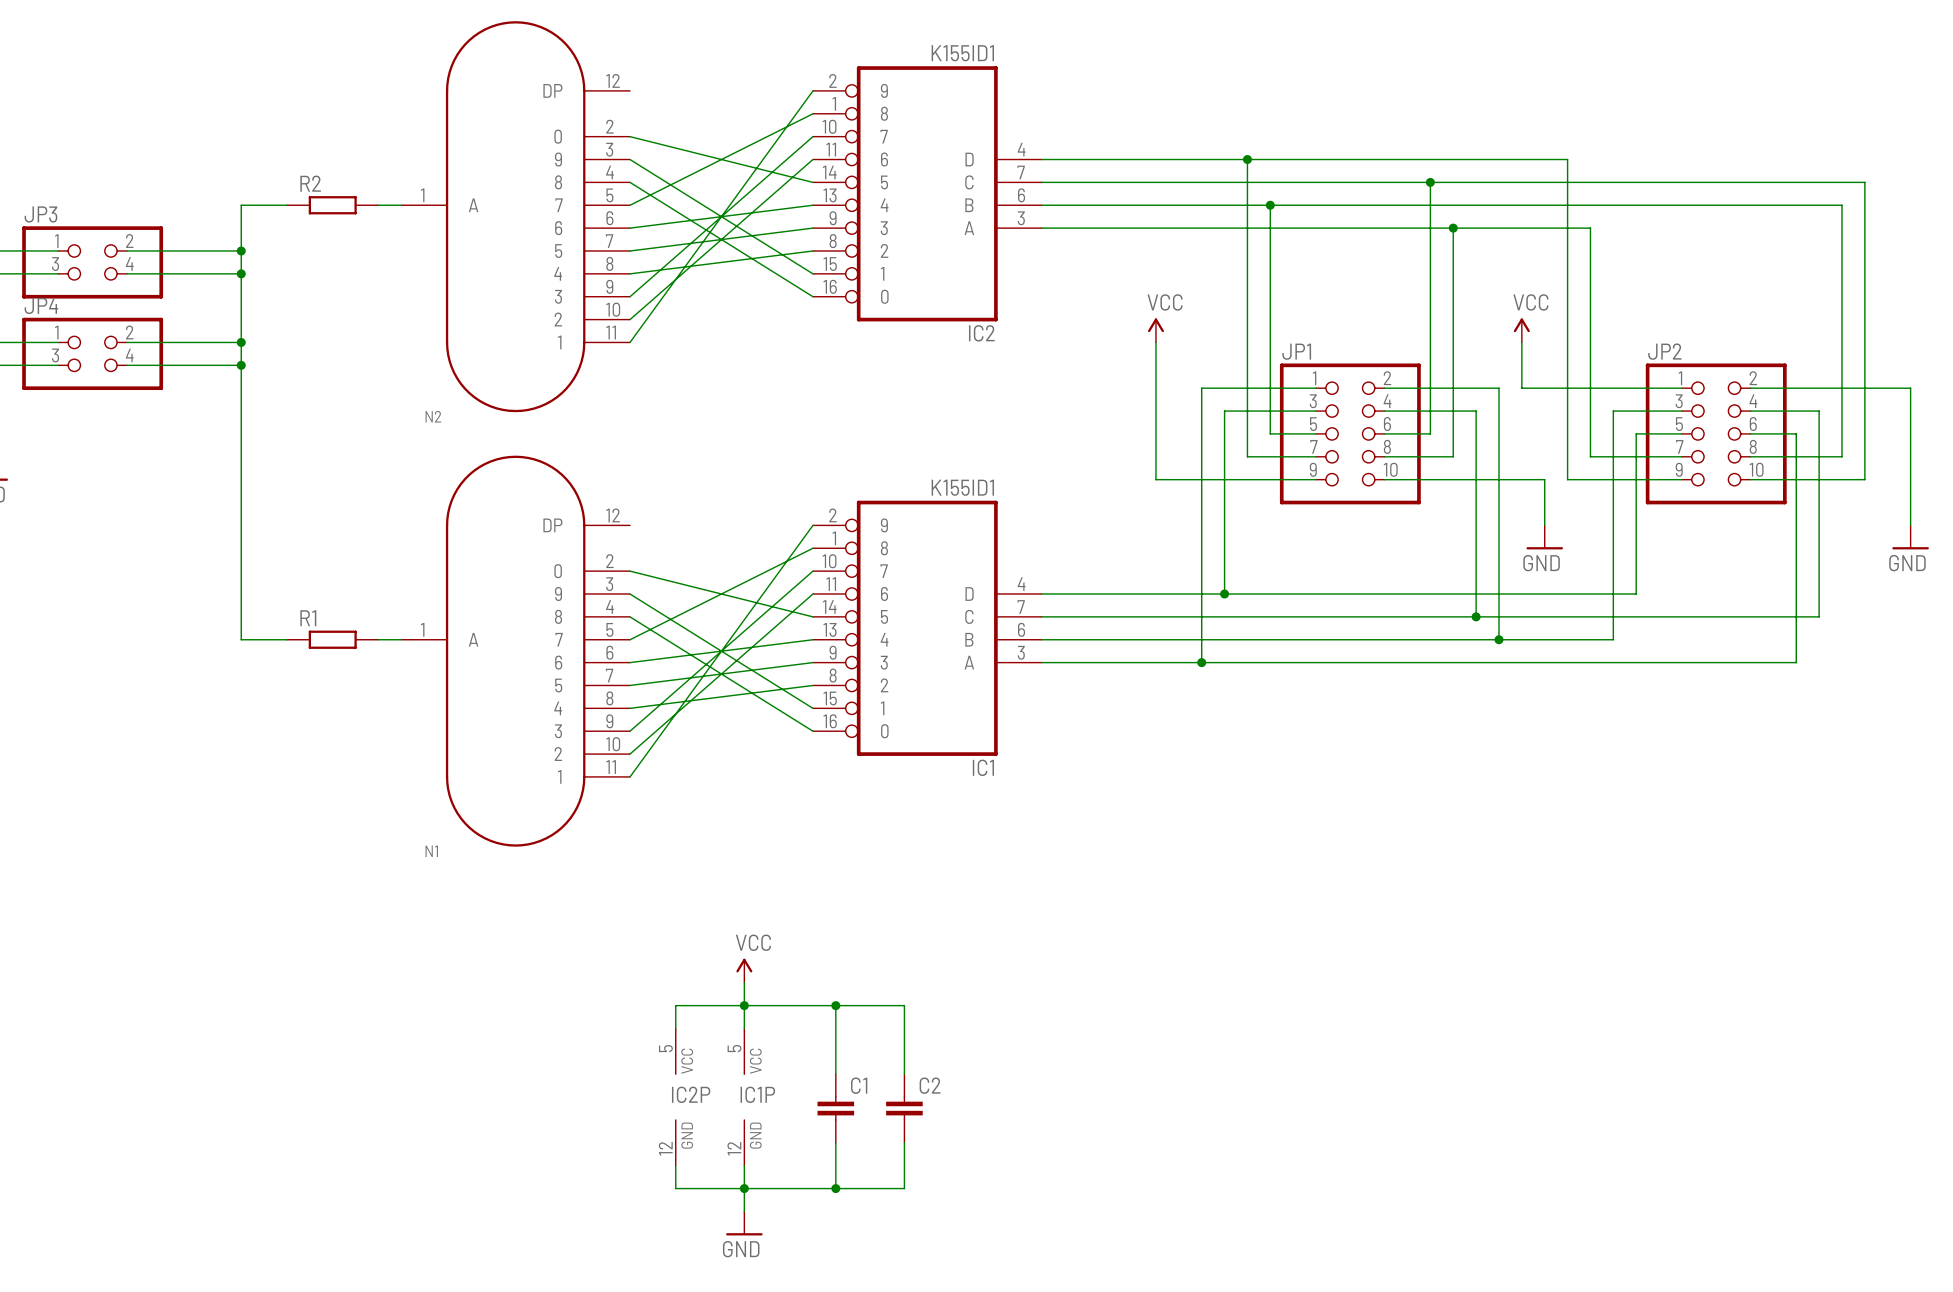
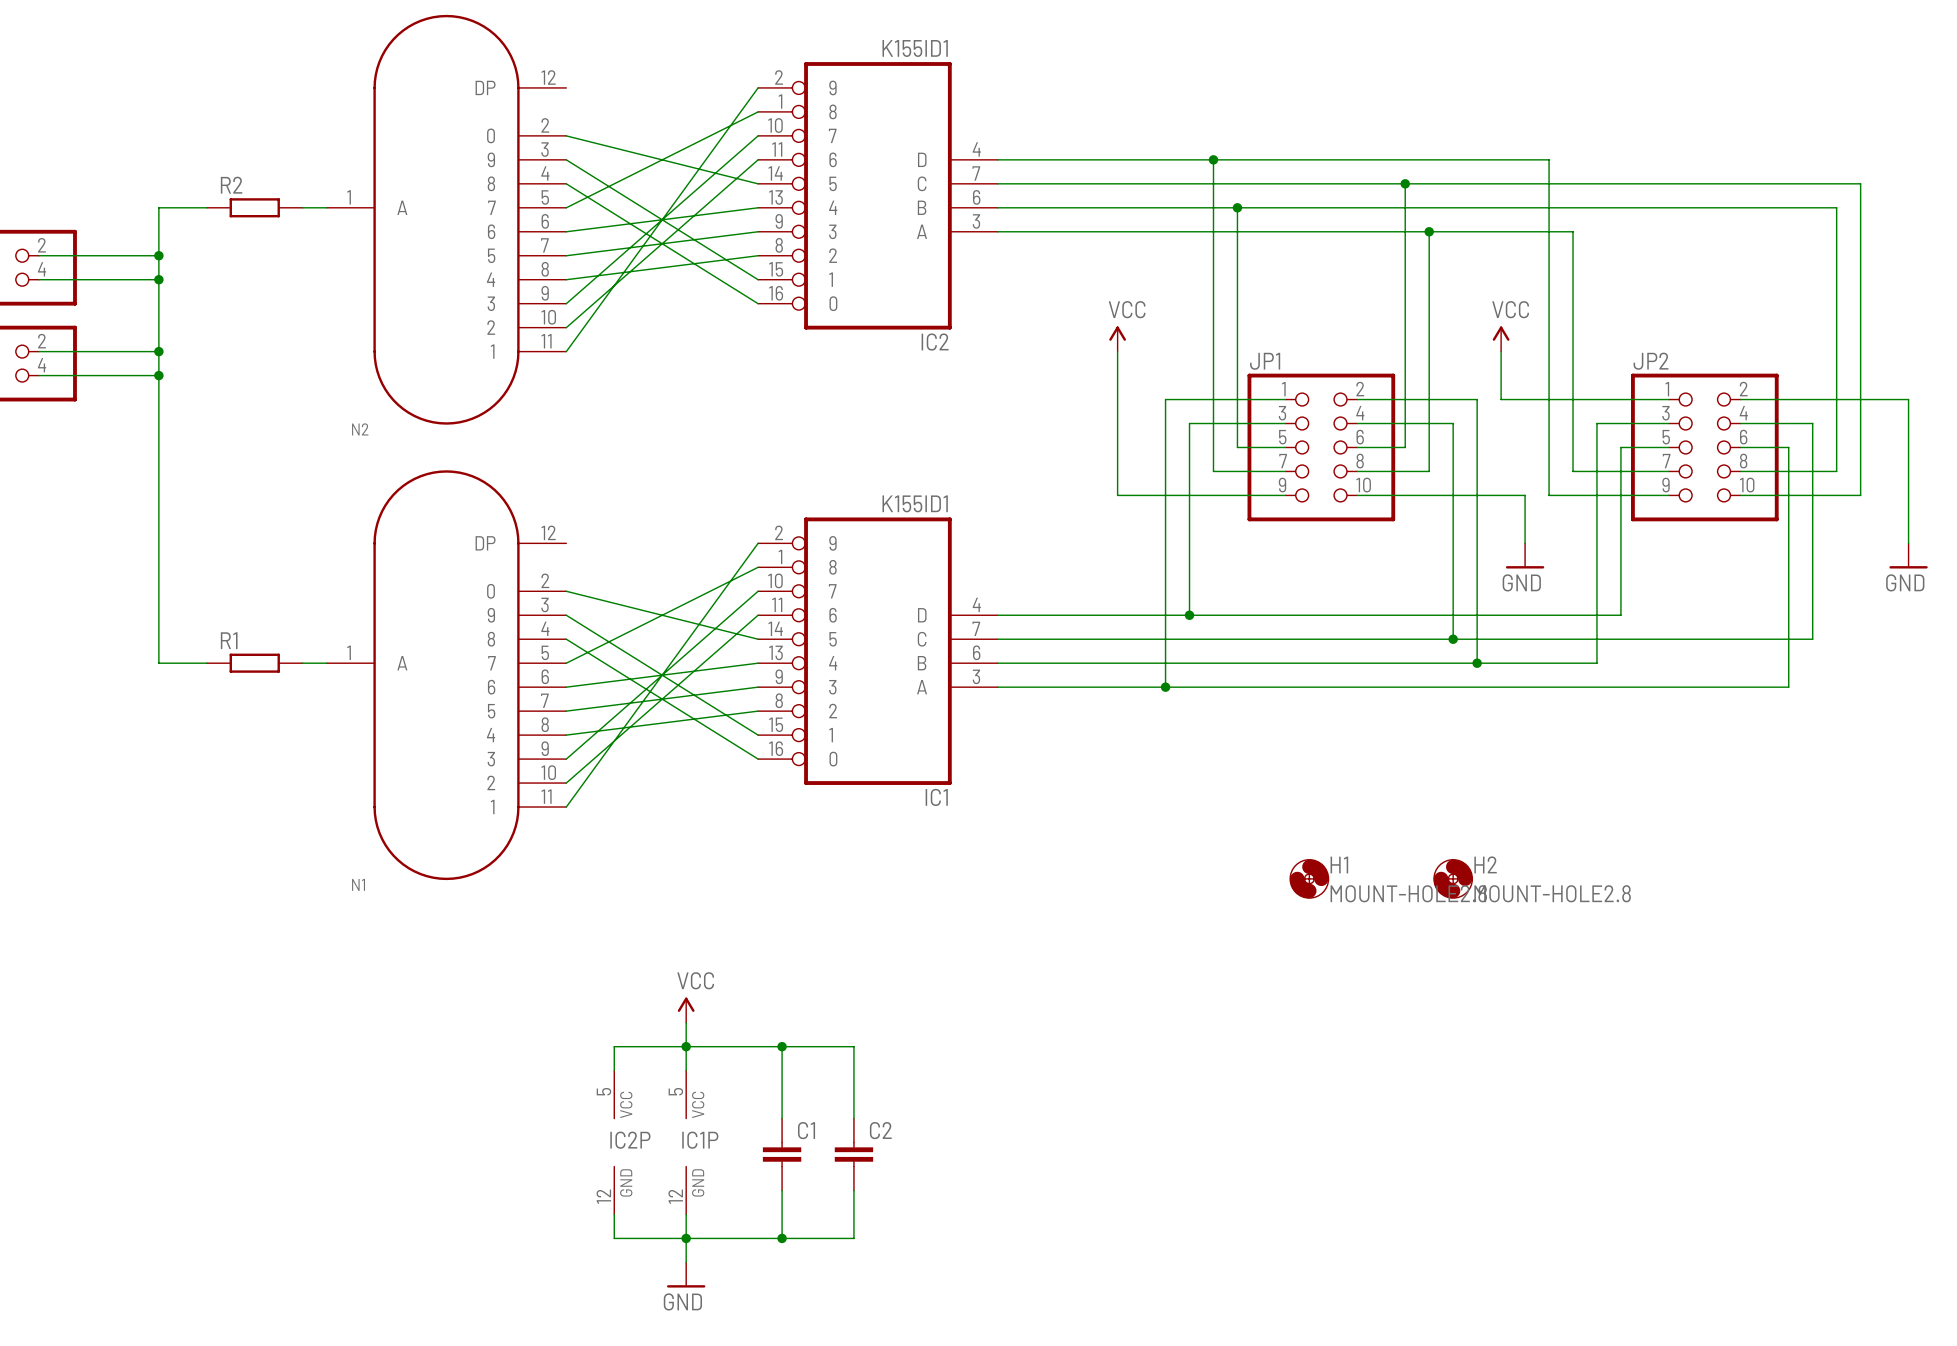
H1: none -> MOUNT-HOLE2.8 (1309, 878)
H2: none -> MOUNT-HOLE2.8 (1453, 878)

